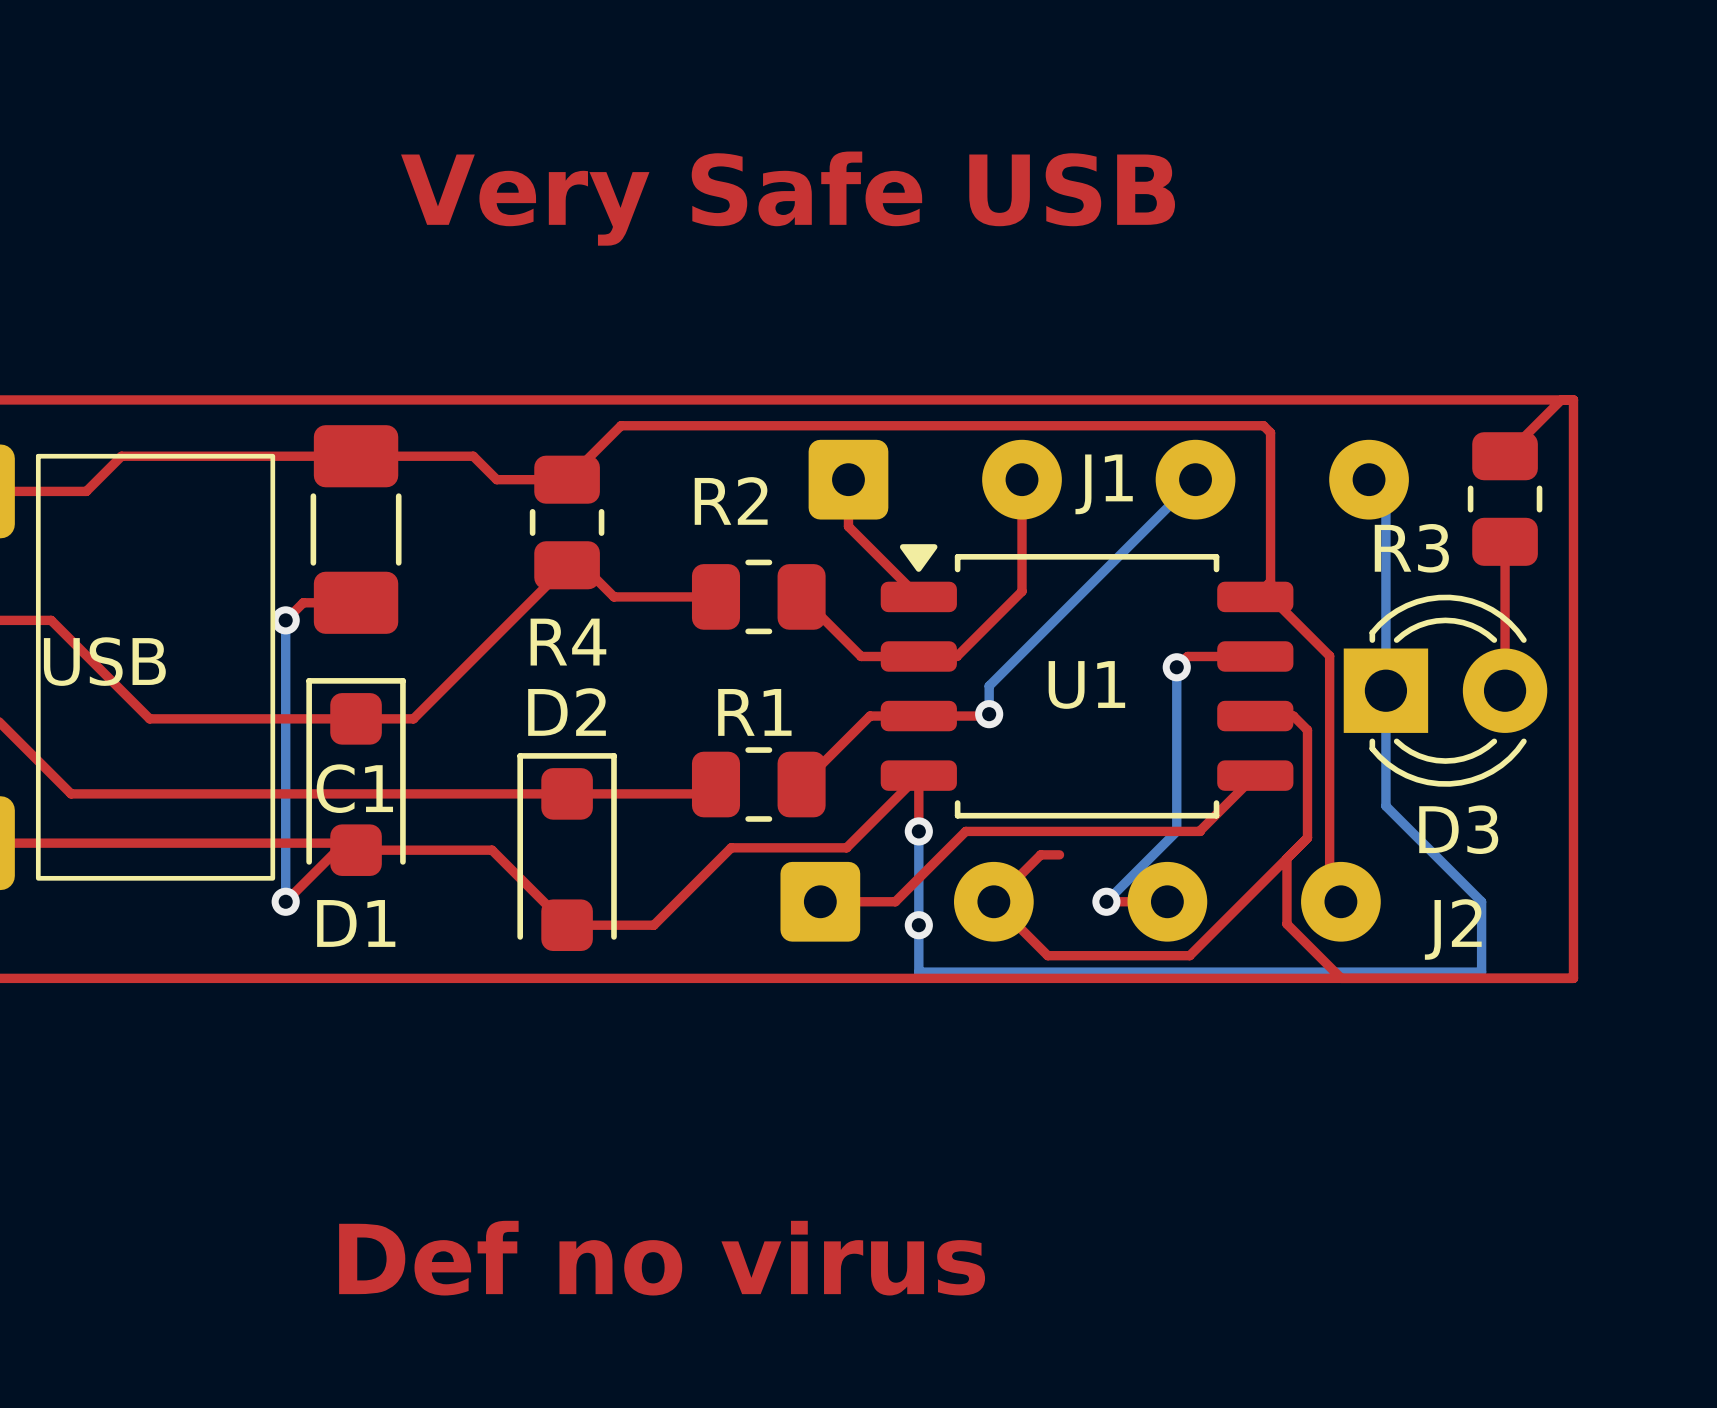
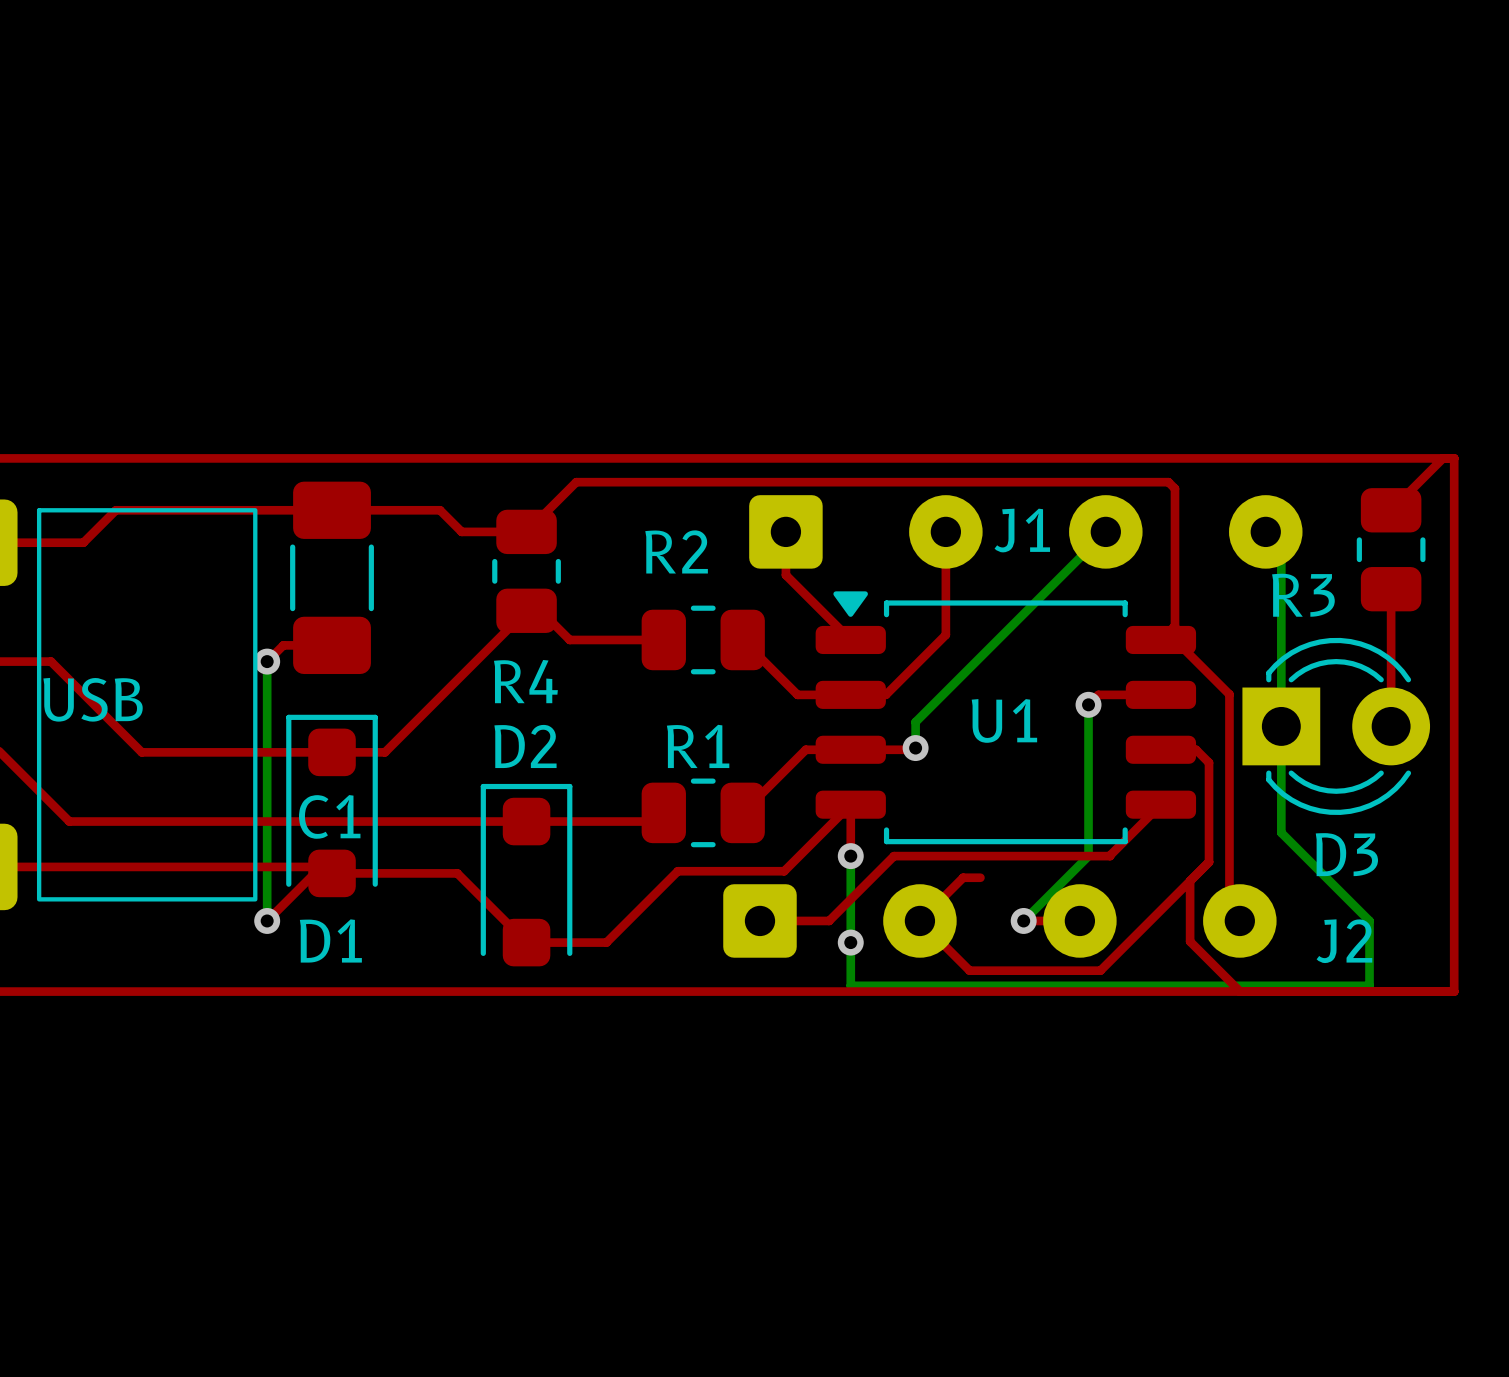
text: Very Safe USB (788, 198) -> none
text: Def no virus (662, 1258) -> none

